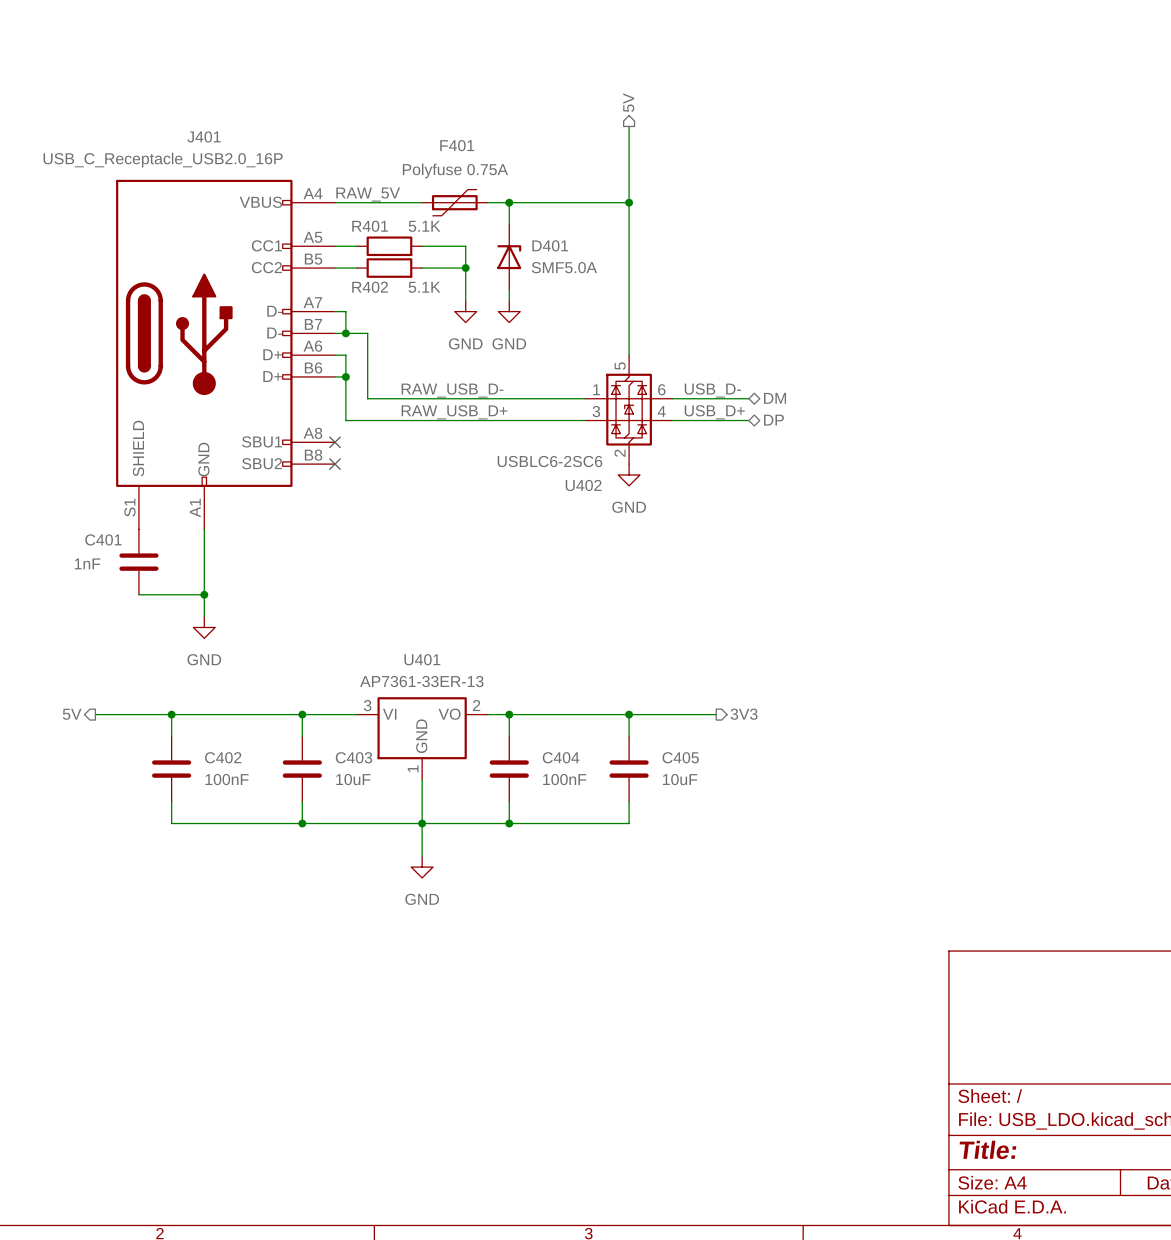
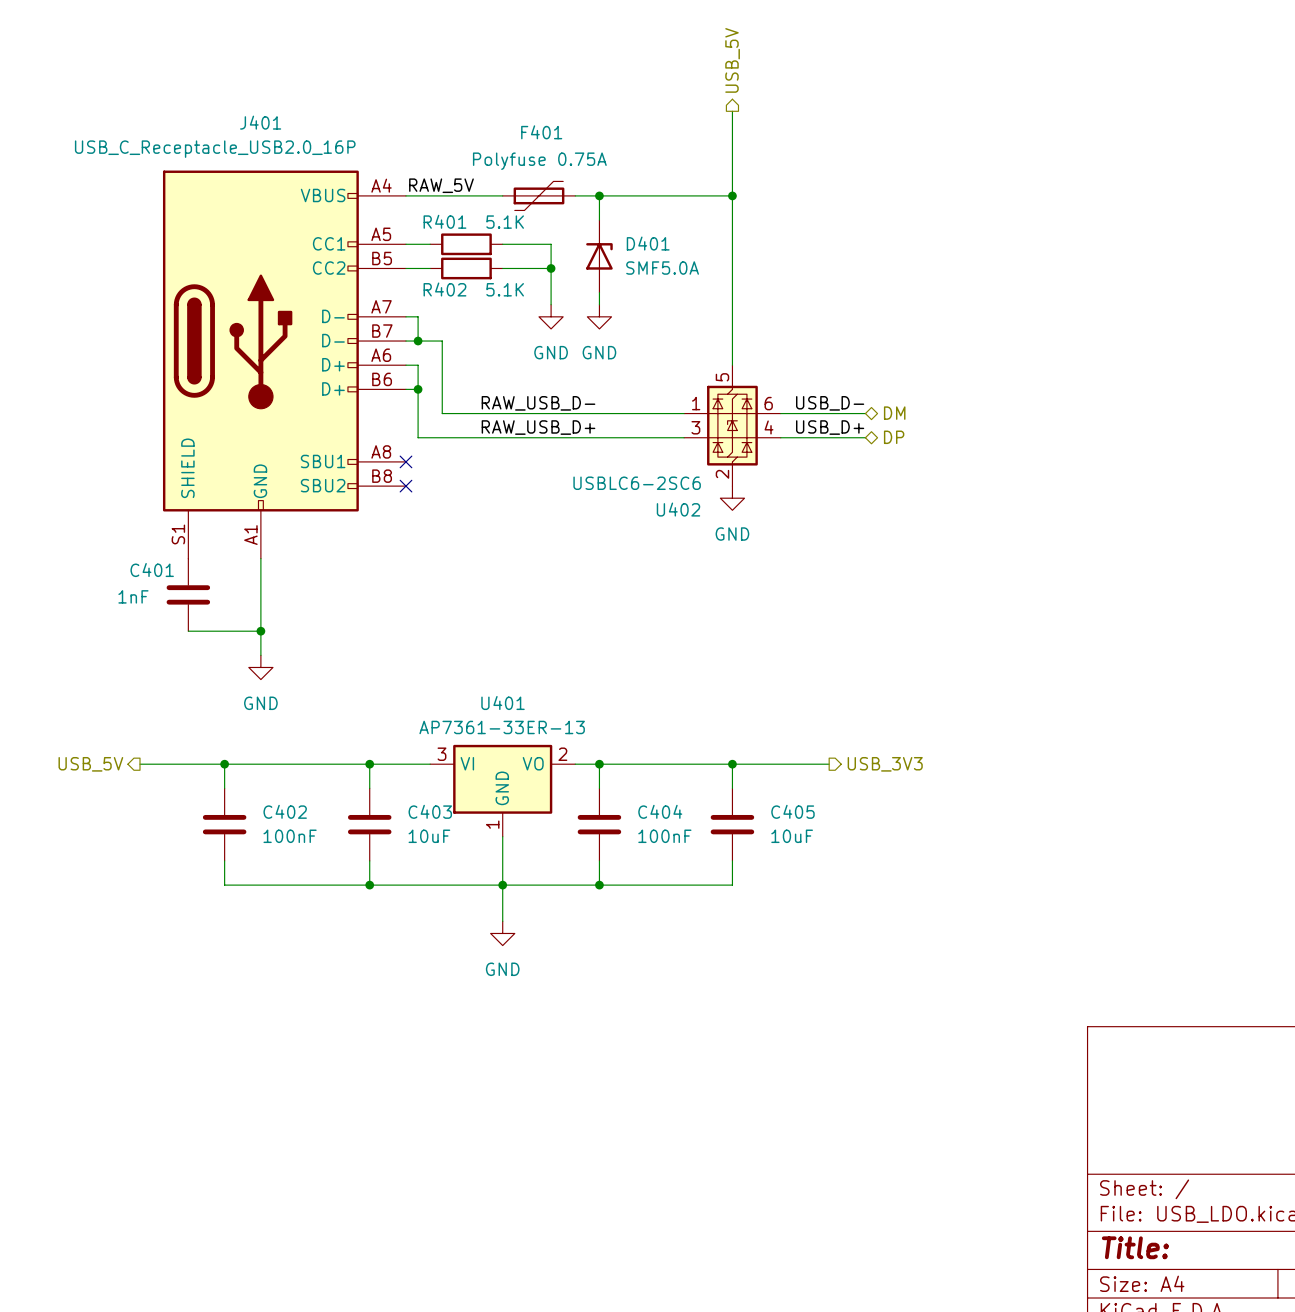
hierarchical label: 5V (628, 102) -> USB_5V (732, 60)
hierarchical label: 5V (72, 714) -> USB_5V (90, 764)
hierarchical label: 3V3 (744, 714) -> USB_3V3 (885, 764)

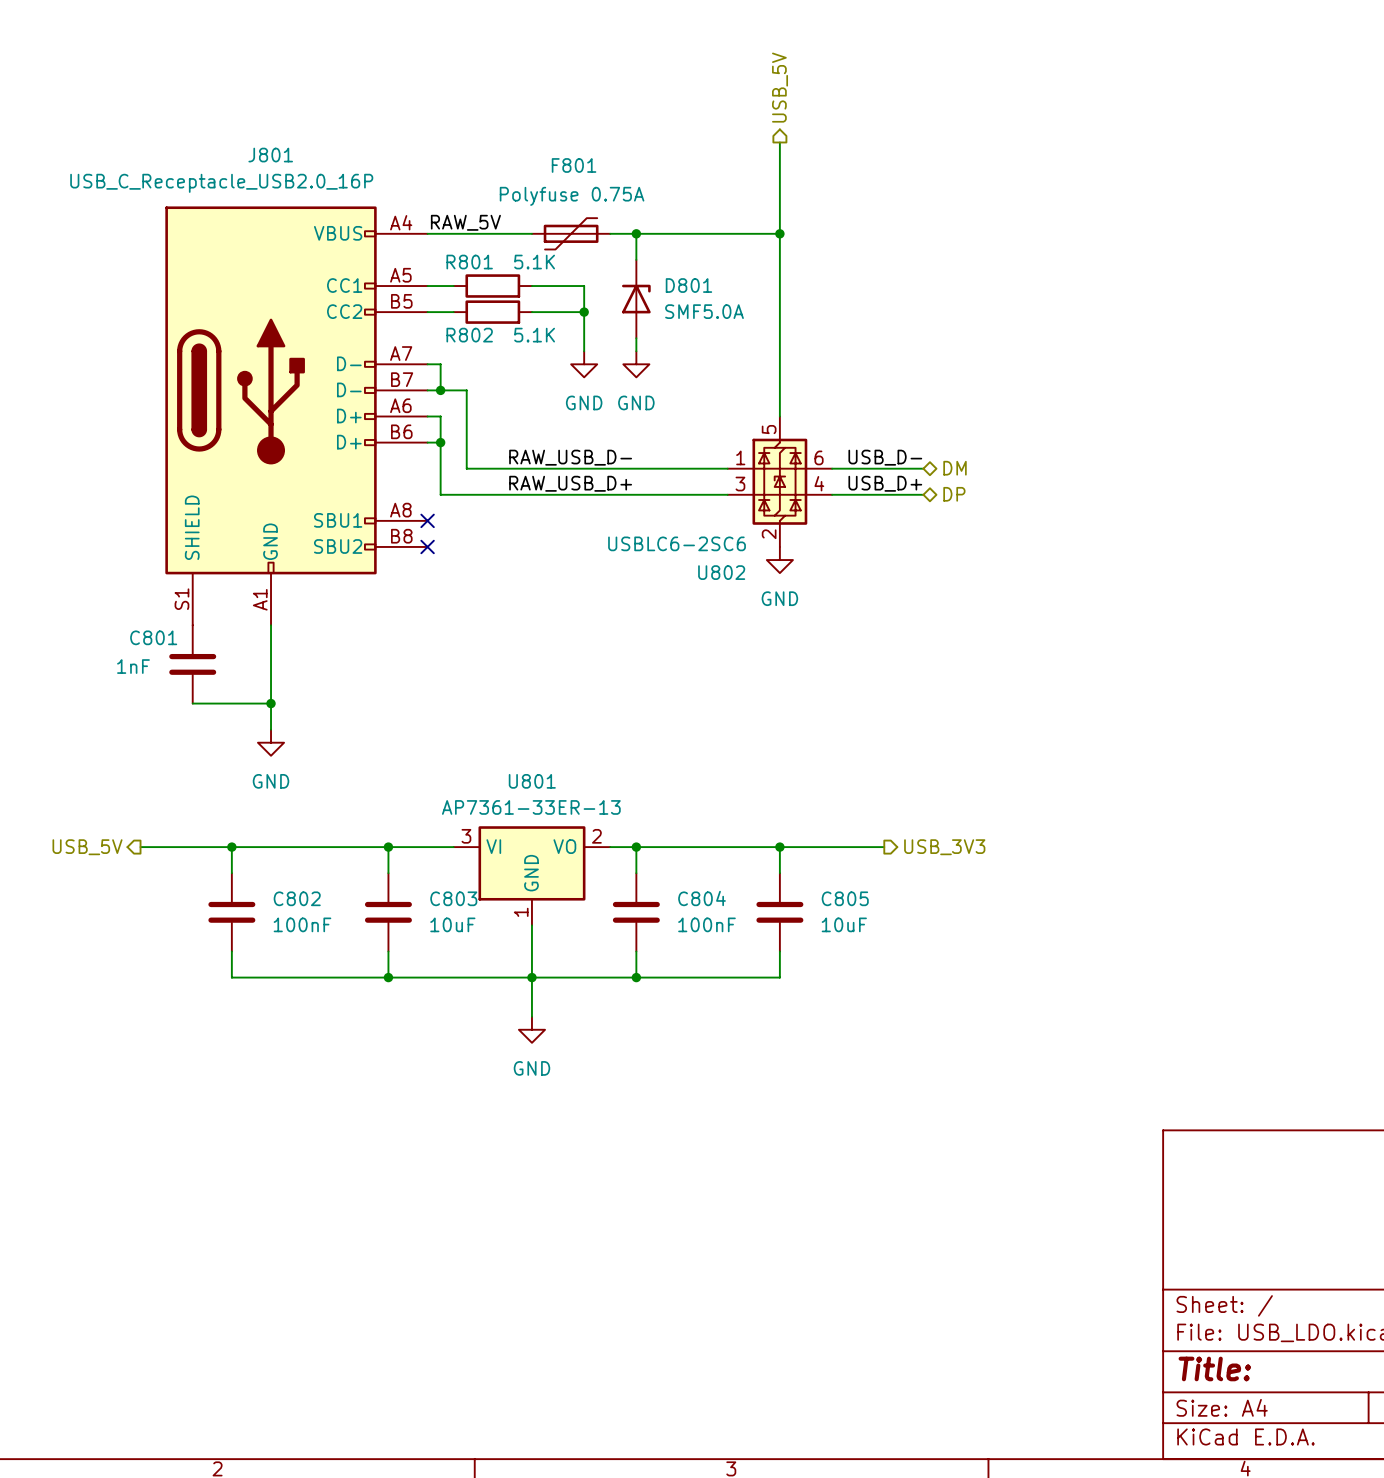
J401 name: J401 (260, 122) -> J801 (270, 155)
F401 name: F401 (541, 132) -> F801 (574, 165)
R401 name: R401 (444, 221) -> R801 (469, 262)
D401 name: D401 (648, 243) -> D801 (688, 285)
R402 name: R402 (444, 289) -> R802 (469, 335)
U402 name: U402 (678, 509) -> U802 (721, 572)
C401 name: C401 (152, 570) -> C801 (153, 637)
U401 name: U401 (503, 703) -> U801 (532, 781)
C402 name: C402 (285, 811) -> C802 (297, 898)
C403 name: C403 (430, 811) -> C803 (453, 898)
C404 name: C404 (660, 811) -> C804 (702, 898)
C405 name: C405 (792, 811) -> C805 (845, 898)

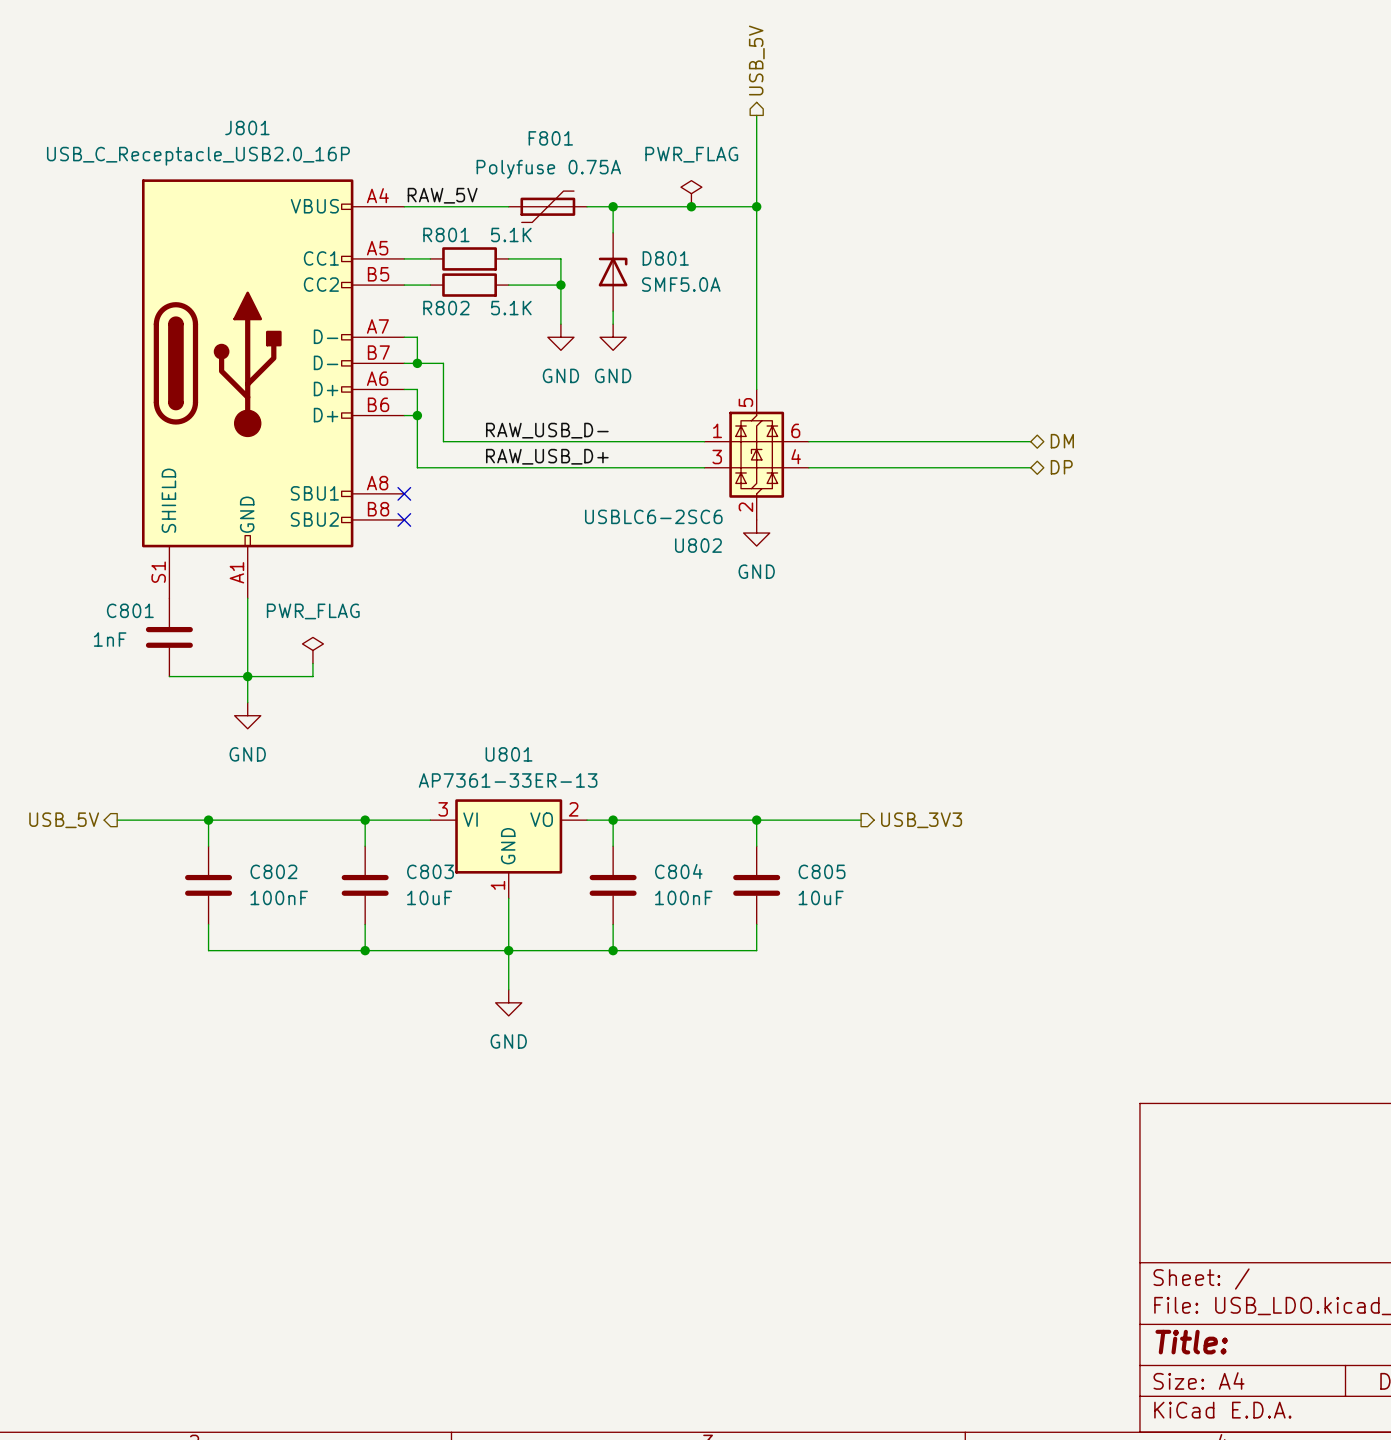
power symbol: none -> PWR_FLAG (691, 193)
junction: none -> (691, 206)
label: USB_D- (885, 457) -> none
wire: none -> (900, 441) (1030, 441)
hierarchical label position: DM (955, 468) -> DM (1062, 441)
label: USB_D+ (885, 483) -> none
wire: none -> (900, 467) (1030, 467)
hierarchical label position: DP (954, 494) -> DP (1061, 467)
power symbol: none -> PWR_FLAG (312, 650)
wire: none -> (312, 663) (312, 676) (247, 676)

